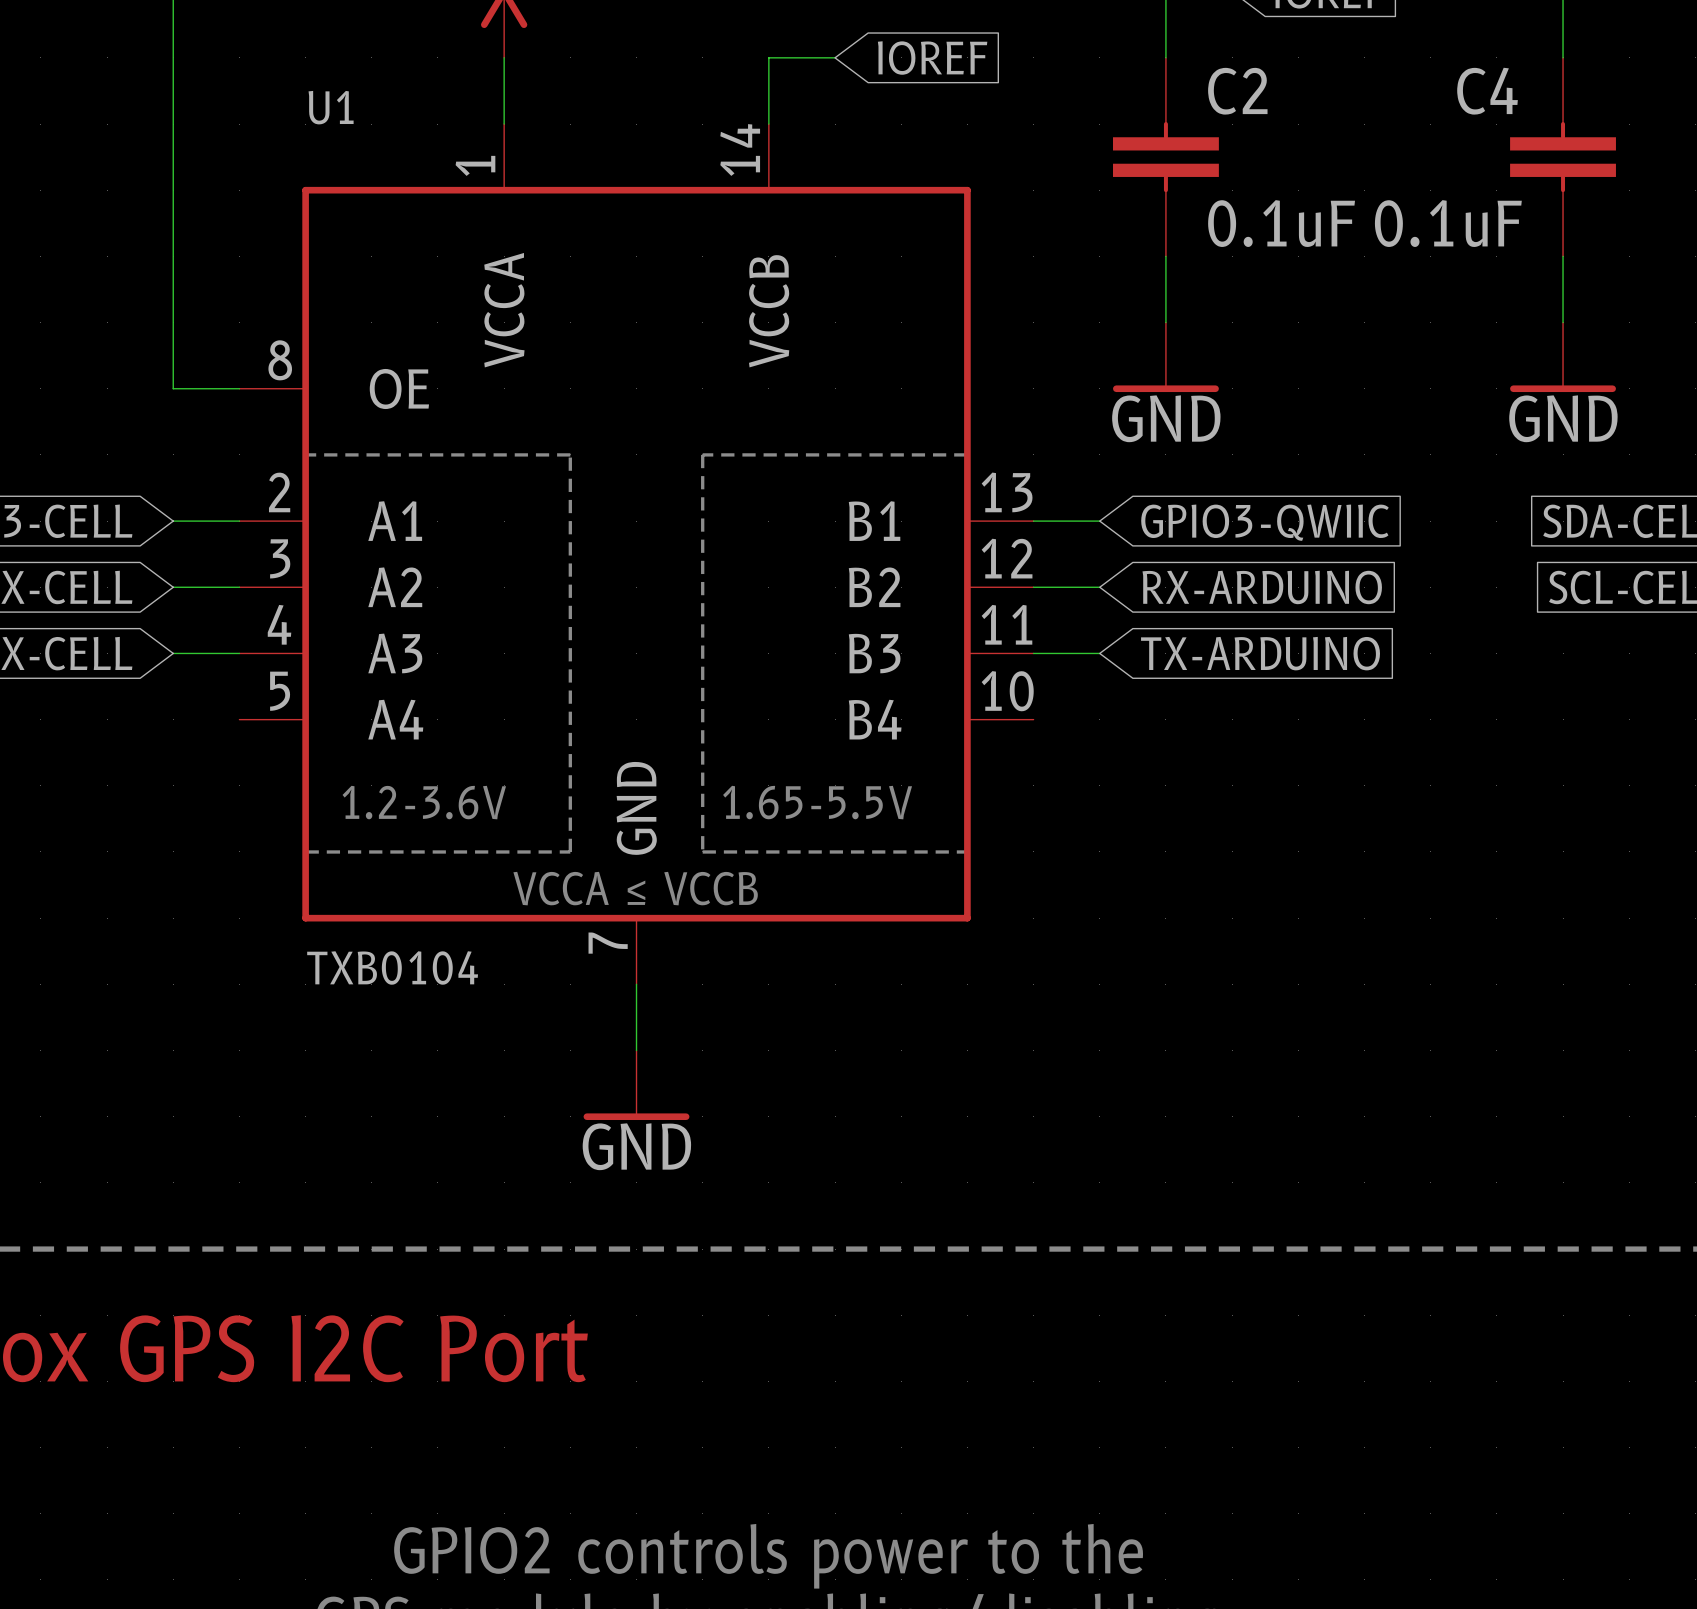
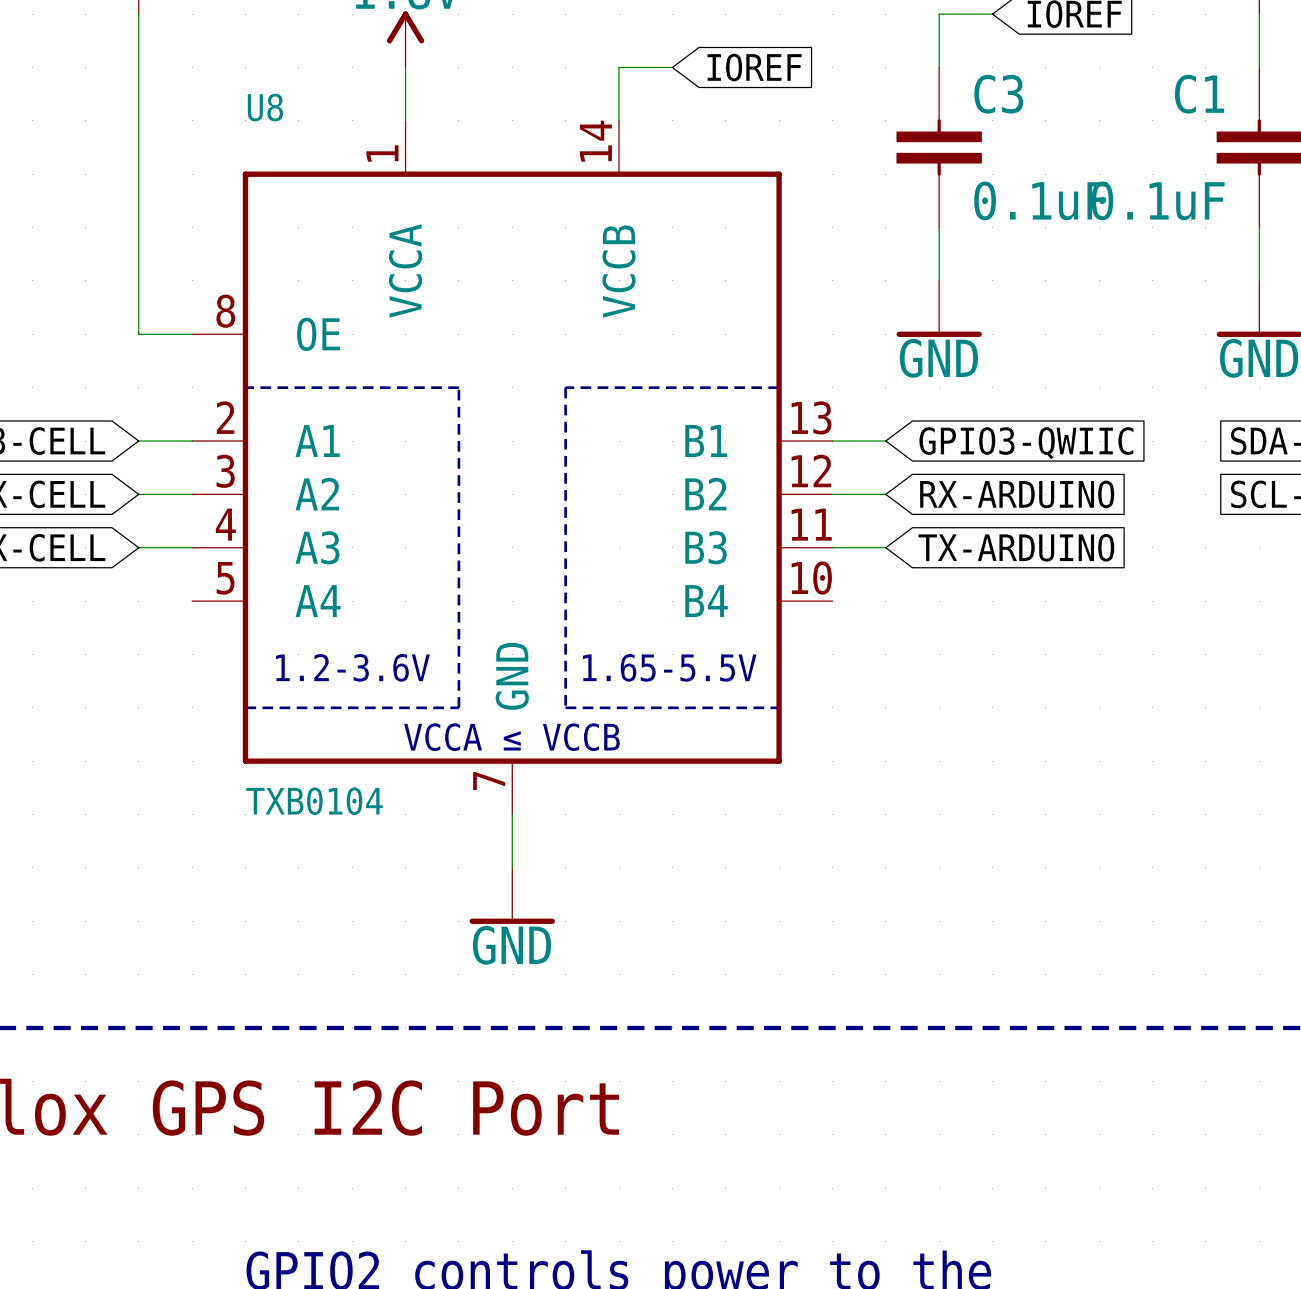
C2 name: C2 (1237, 91) -> C3 (998, 94)
C4 name: C4 (1487, 91) -> C1 (1199, 94)
U1 name: U1 (331, 107) -> U8 (265, 107)

